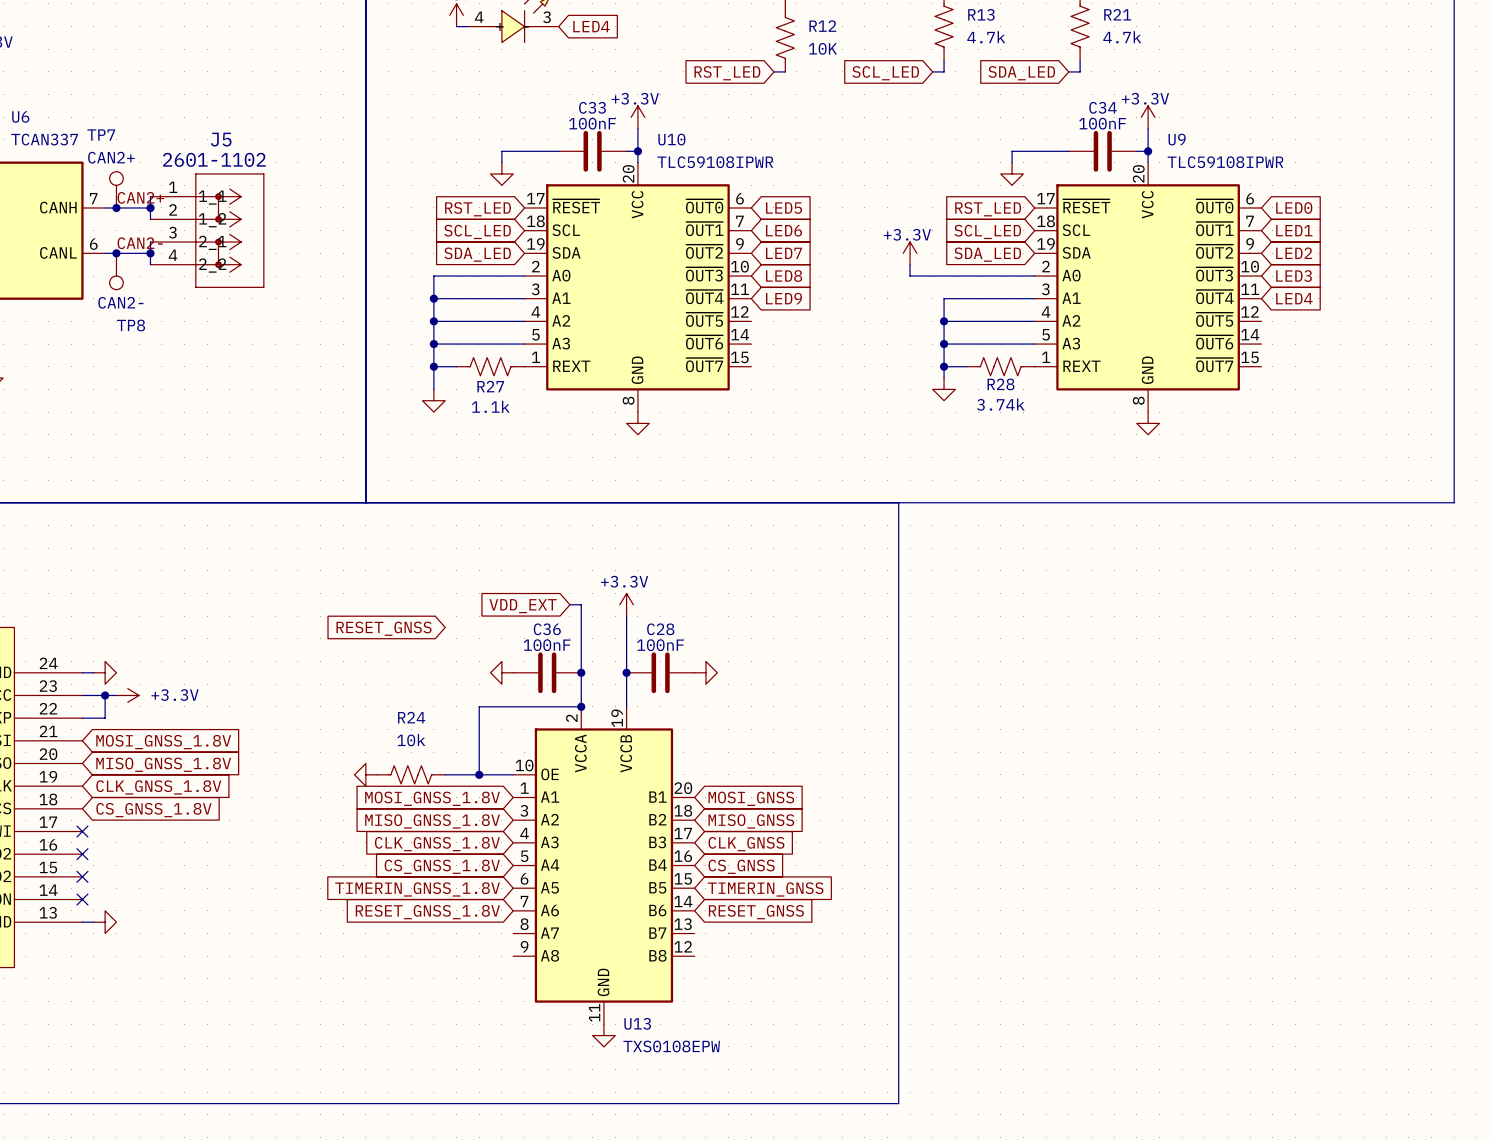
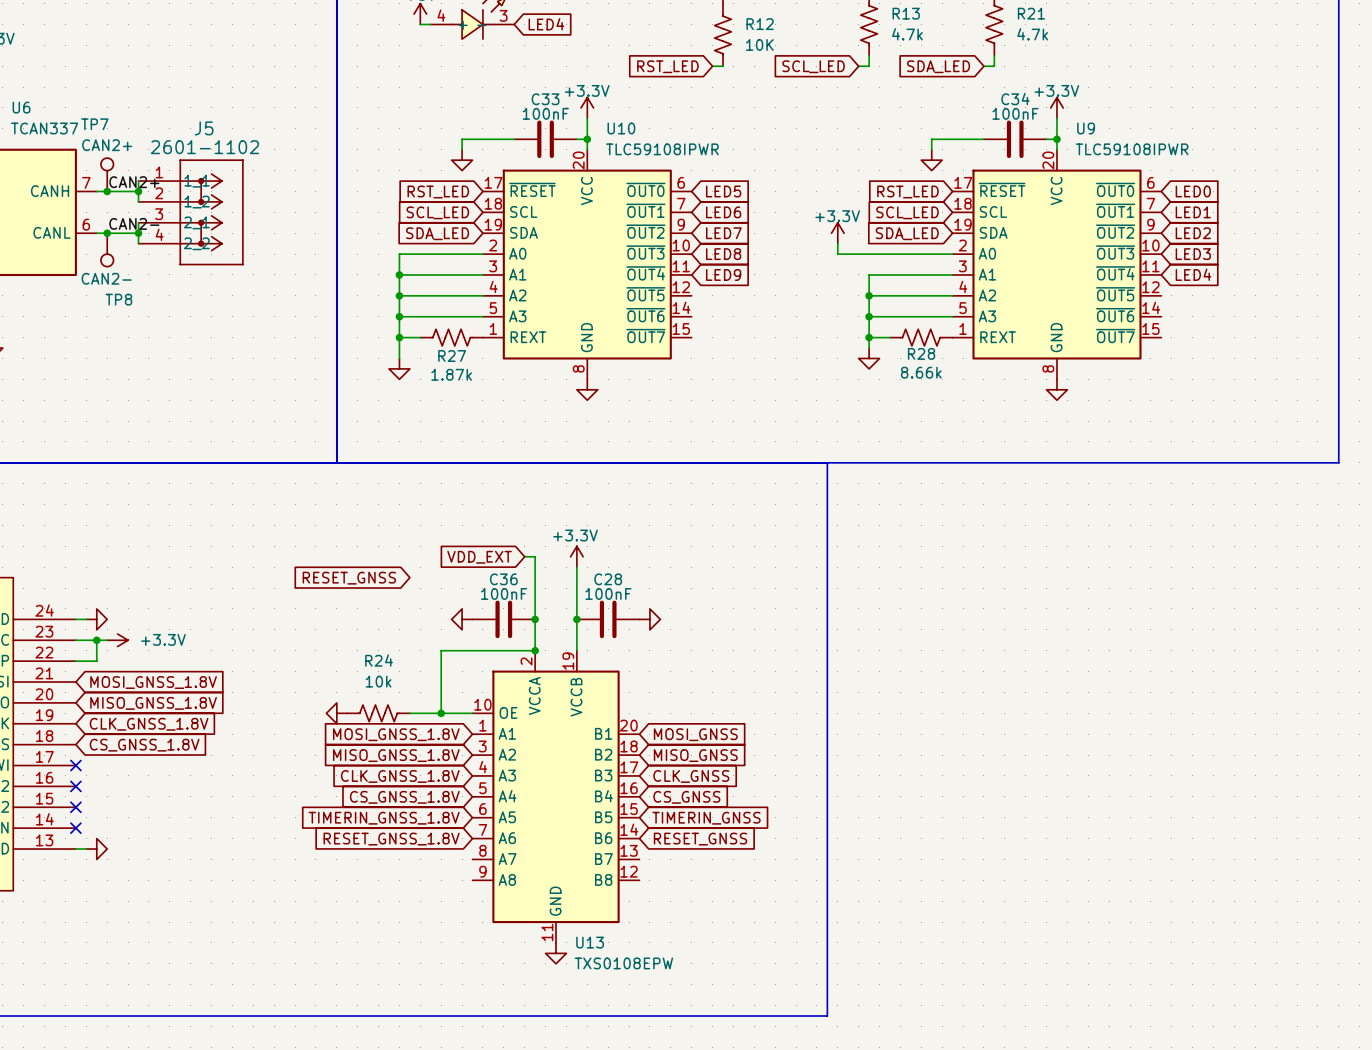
R28 value: 3.74k (1000, 404) -> 8.66k (921, 372)
R27 value: 1.1k (490, 406) -> 1.87k (451, 374)

